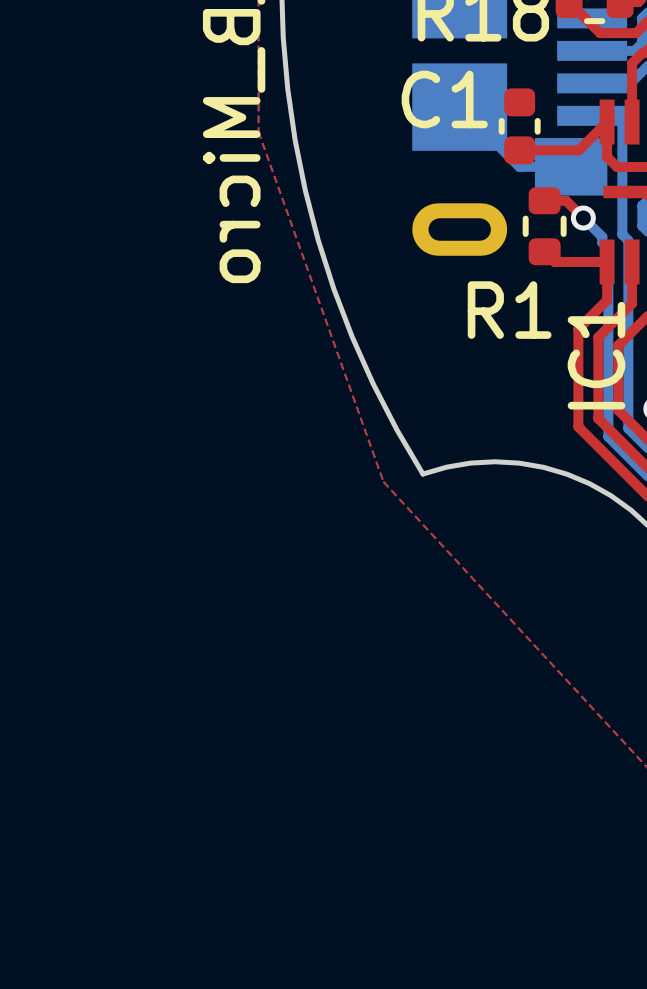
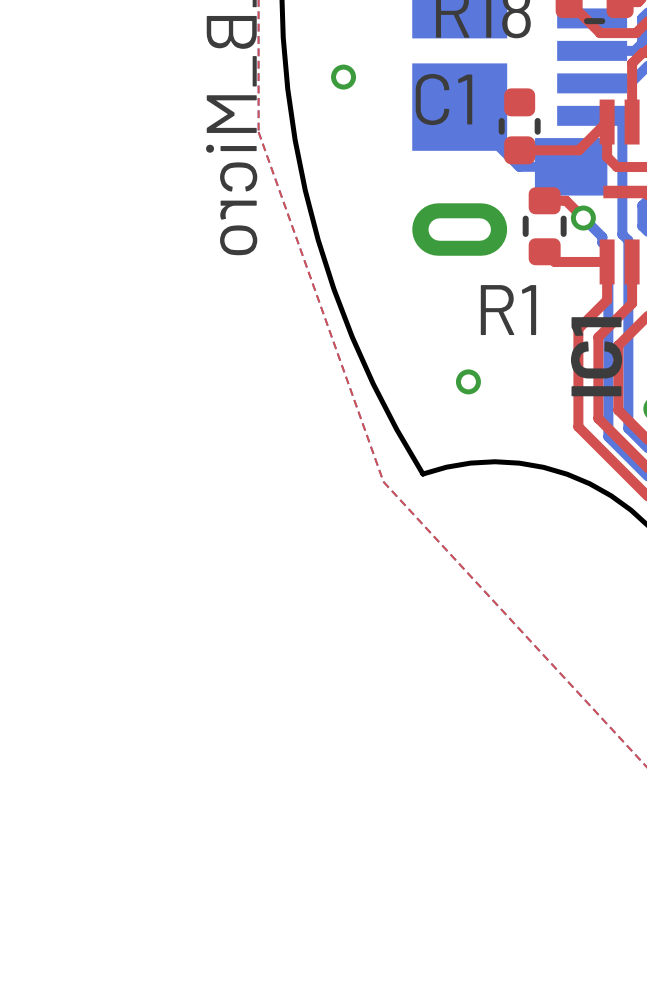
via: none -> (343, 77)
via: none -> (468, 381)

